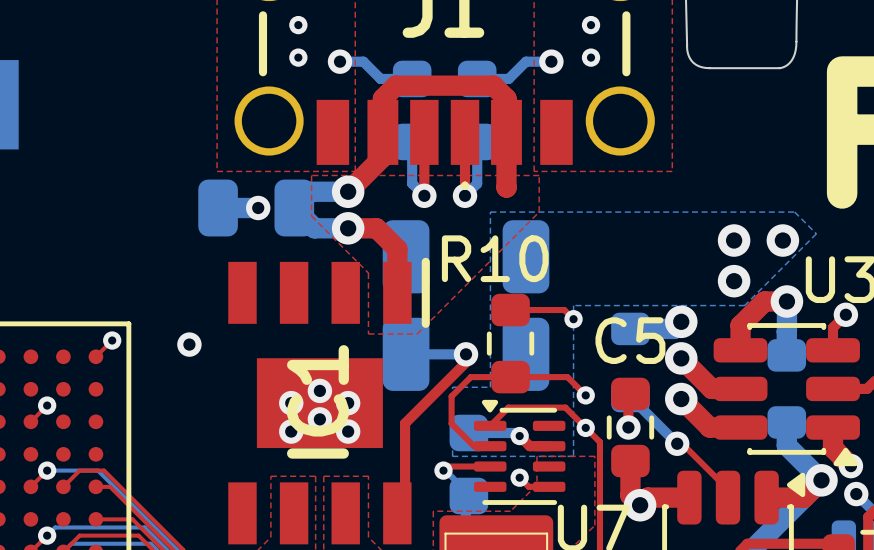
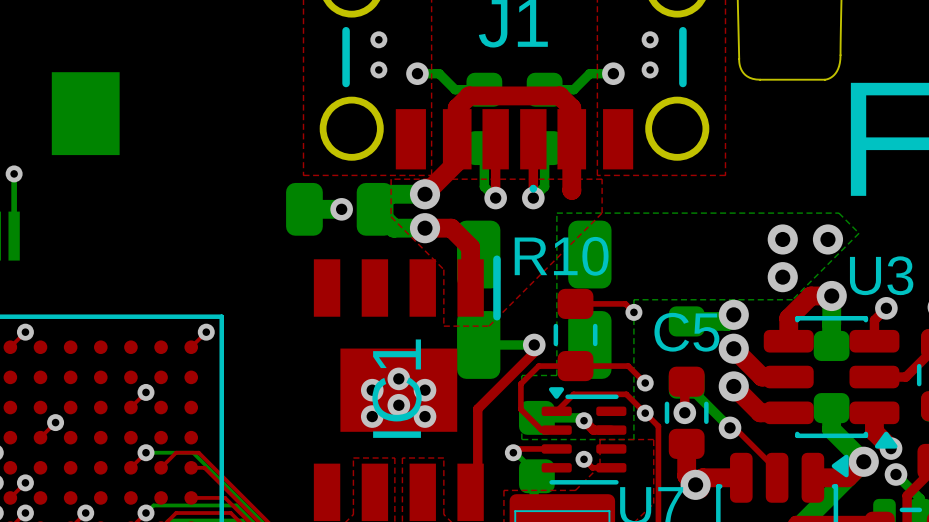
via: (189, 344) -> none

